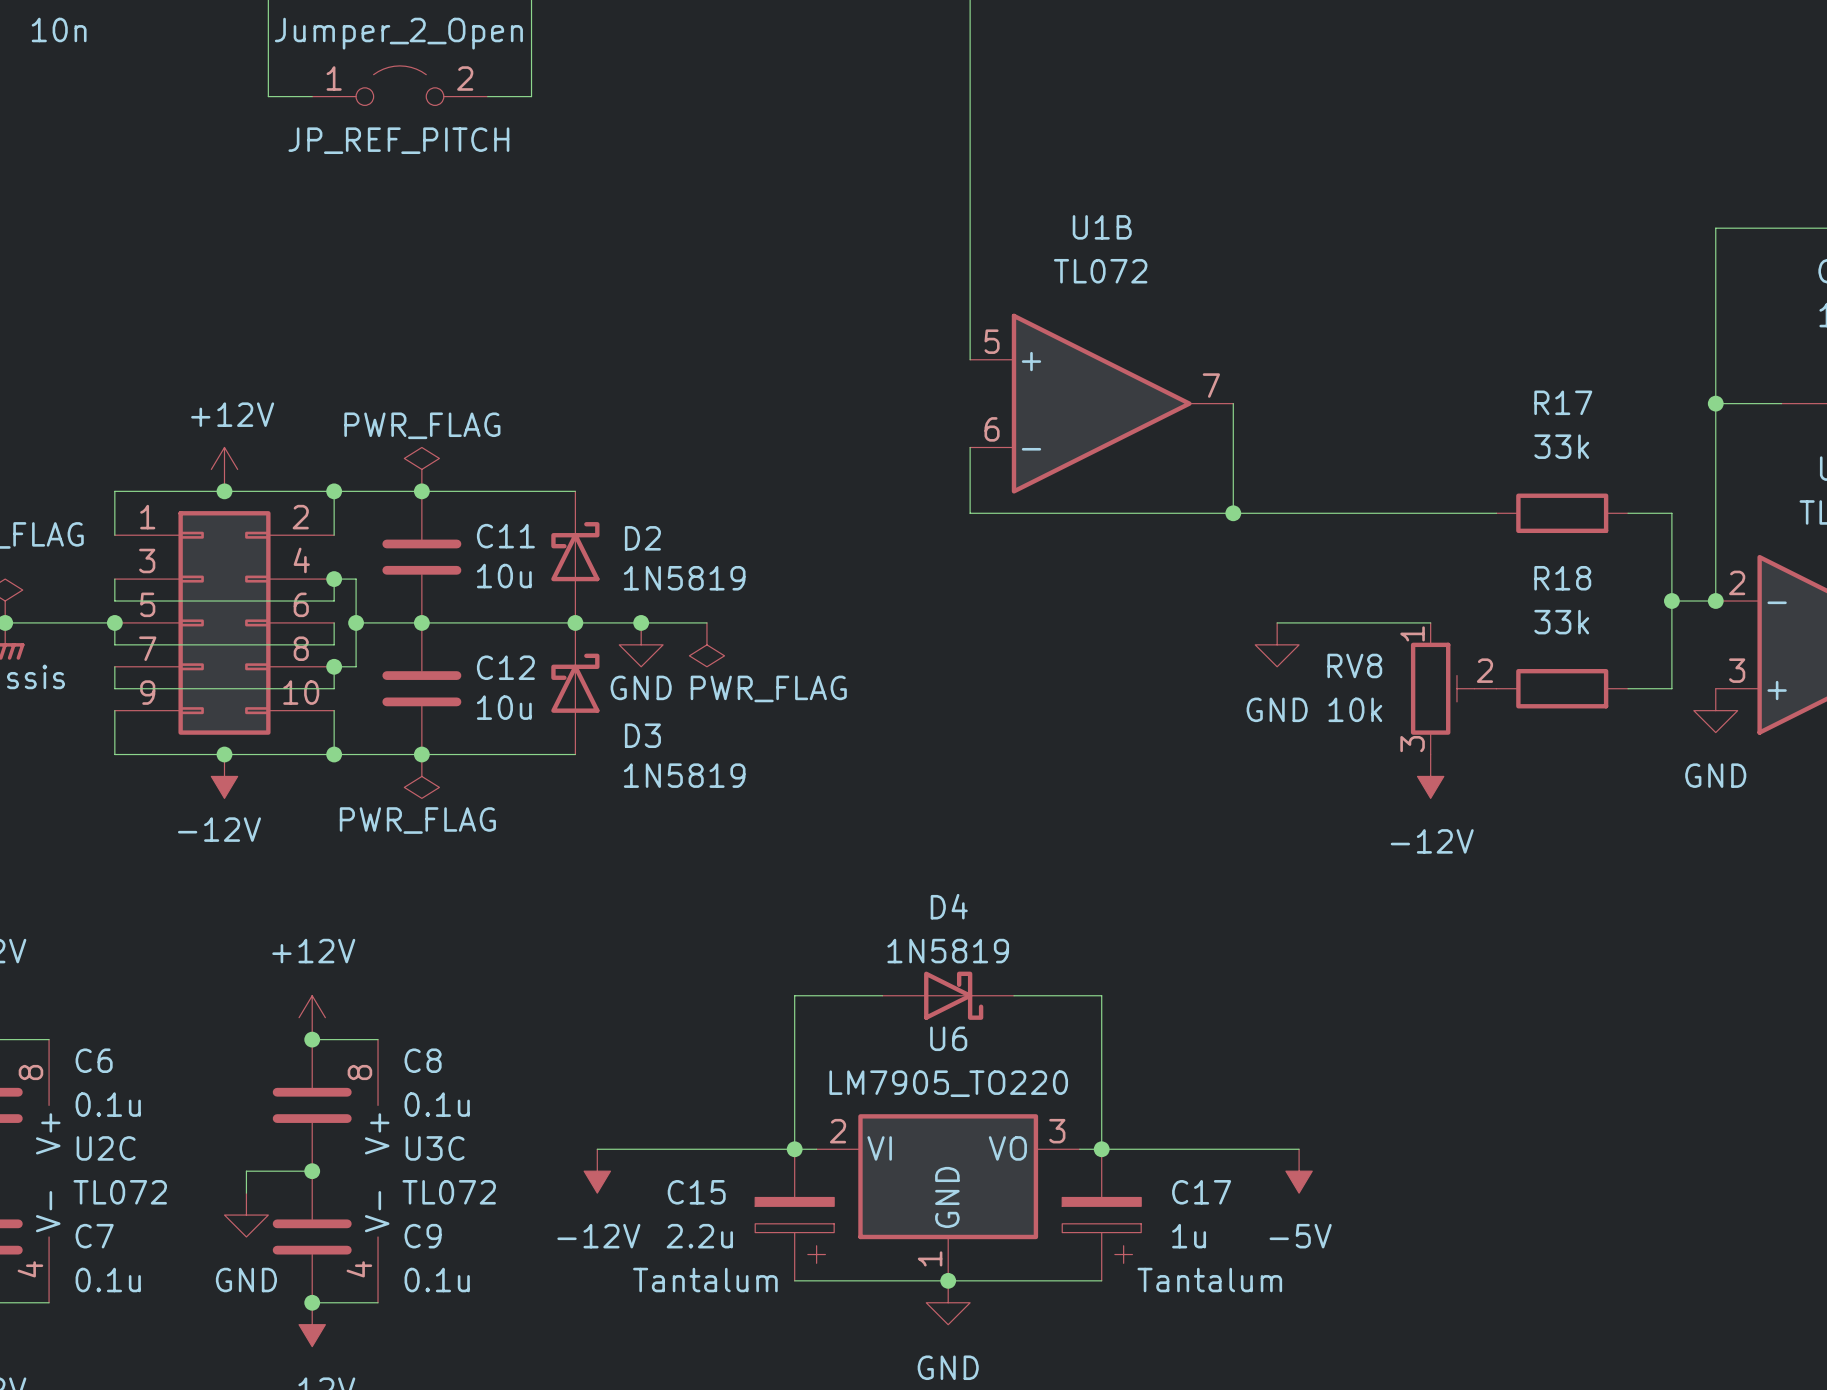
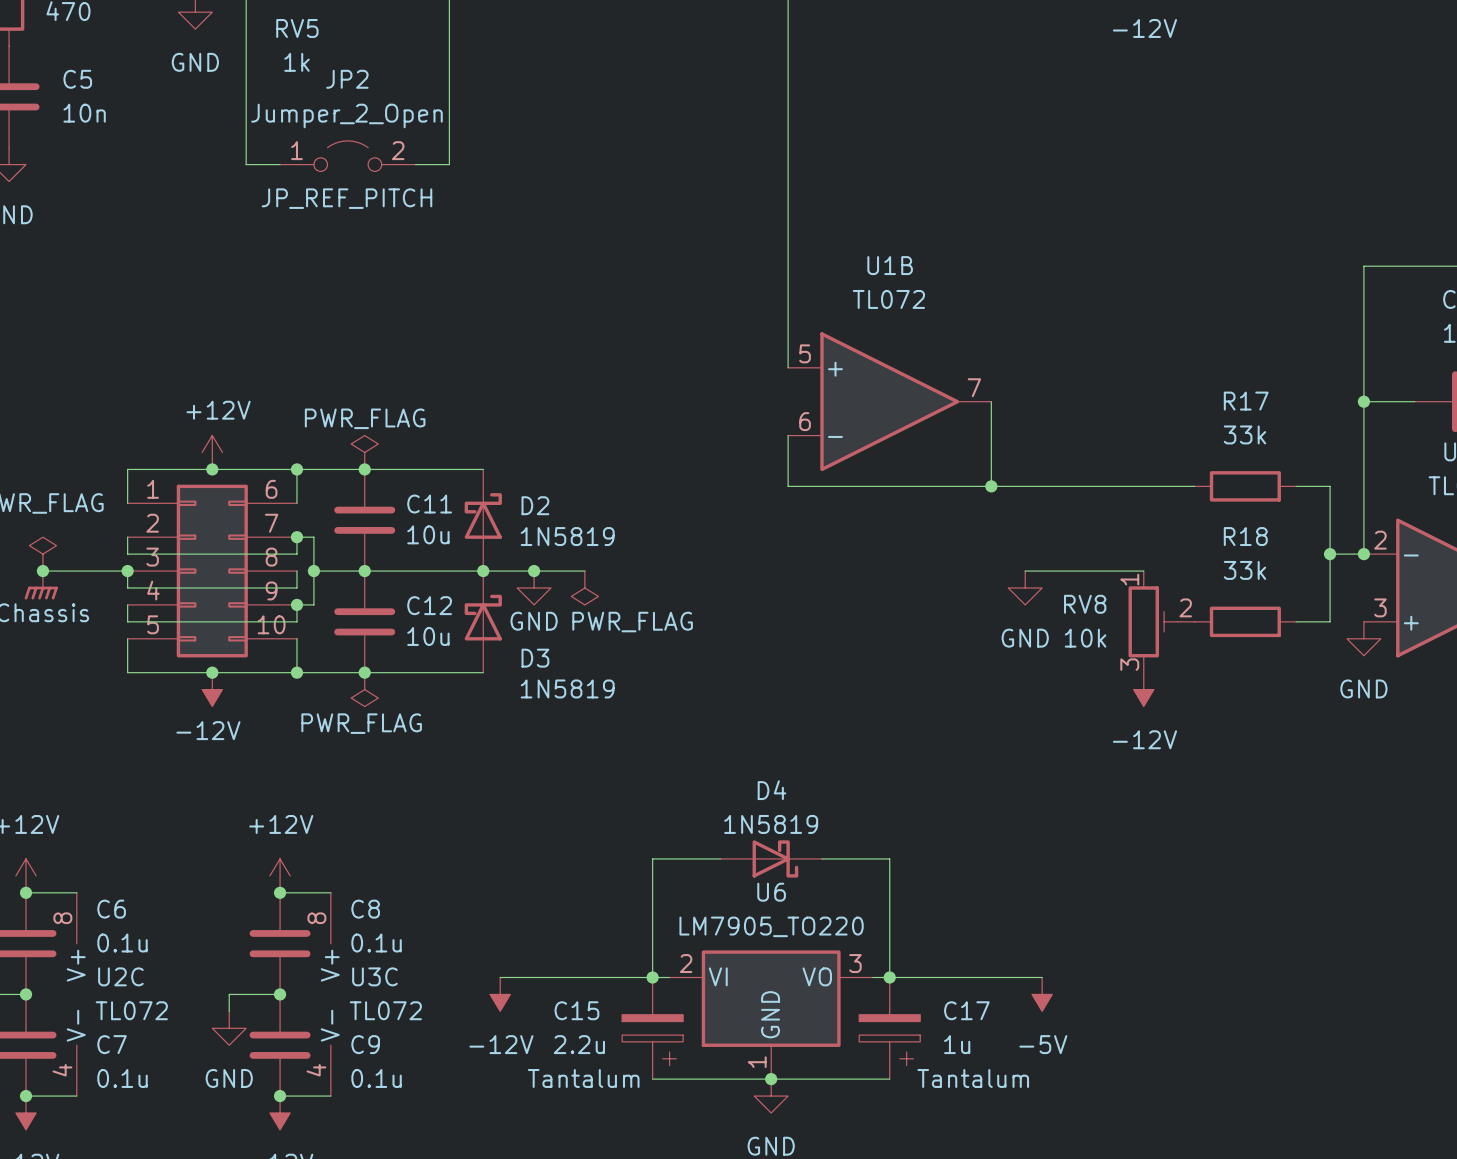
part pin number: 2 (300, 517) -> 6 (271, 489)
part pin number: 3 (147, 560) -> 2 (152, 523)
part pin number: 4 (301, 560) -> 7 (271, 523)
part pin number: 5 (147, 604) -> 3 (152, 557)
part pin number: 6 (301, 604) -> 8 (271, 557)
part pin number: 7 (147, 648) -> 4 (153, 590)
part pin number: 8 (301, 648) -> 9 (271, 590)
part pin number: 9 (147, 692) -> 5 (153, 624)

